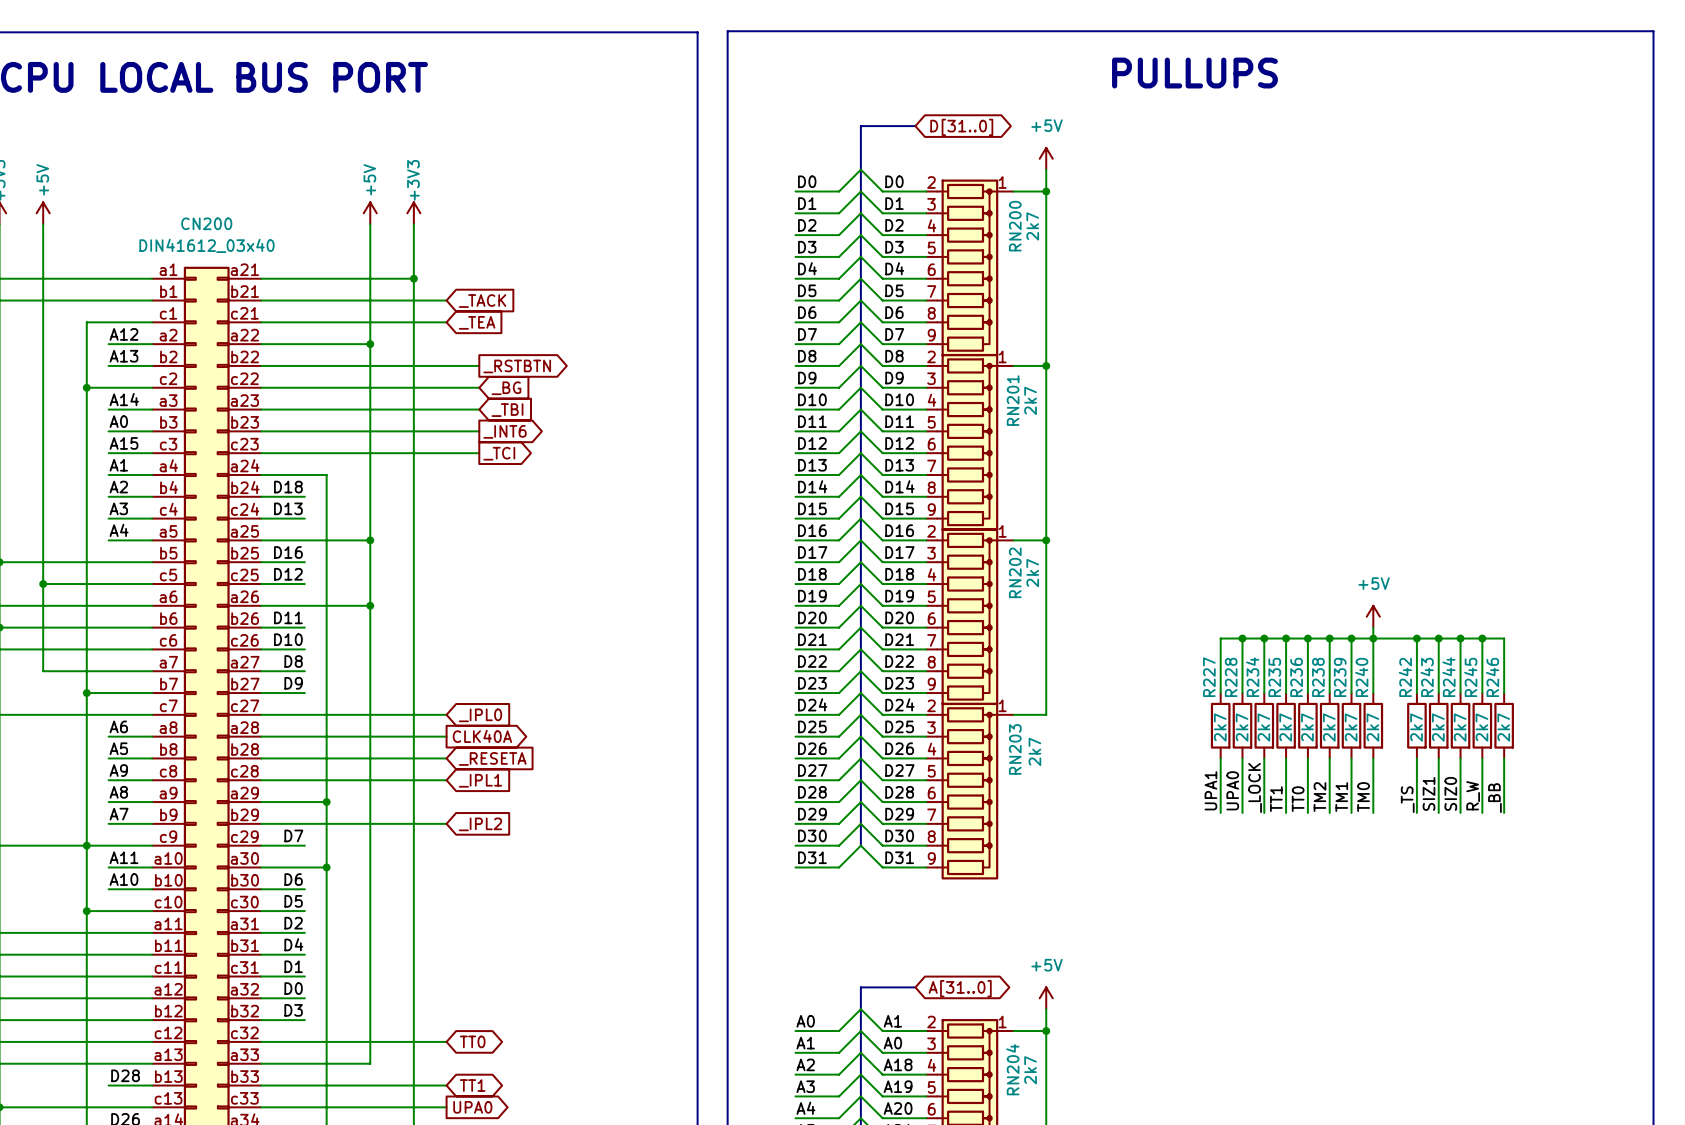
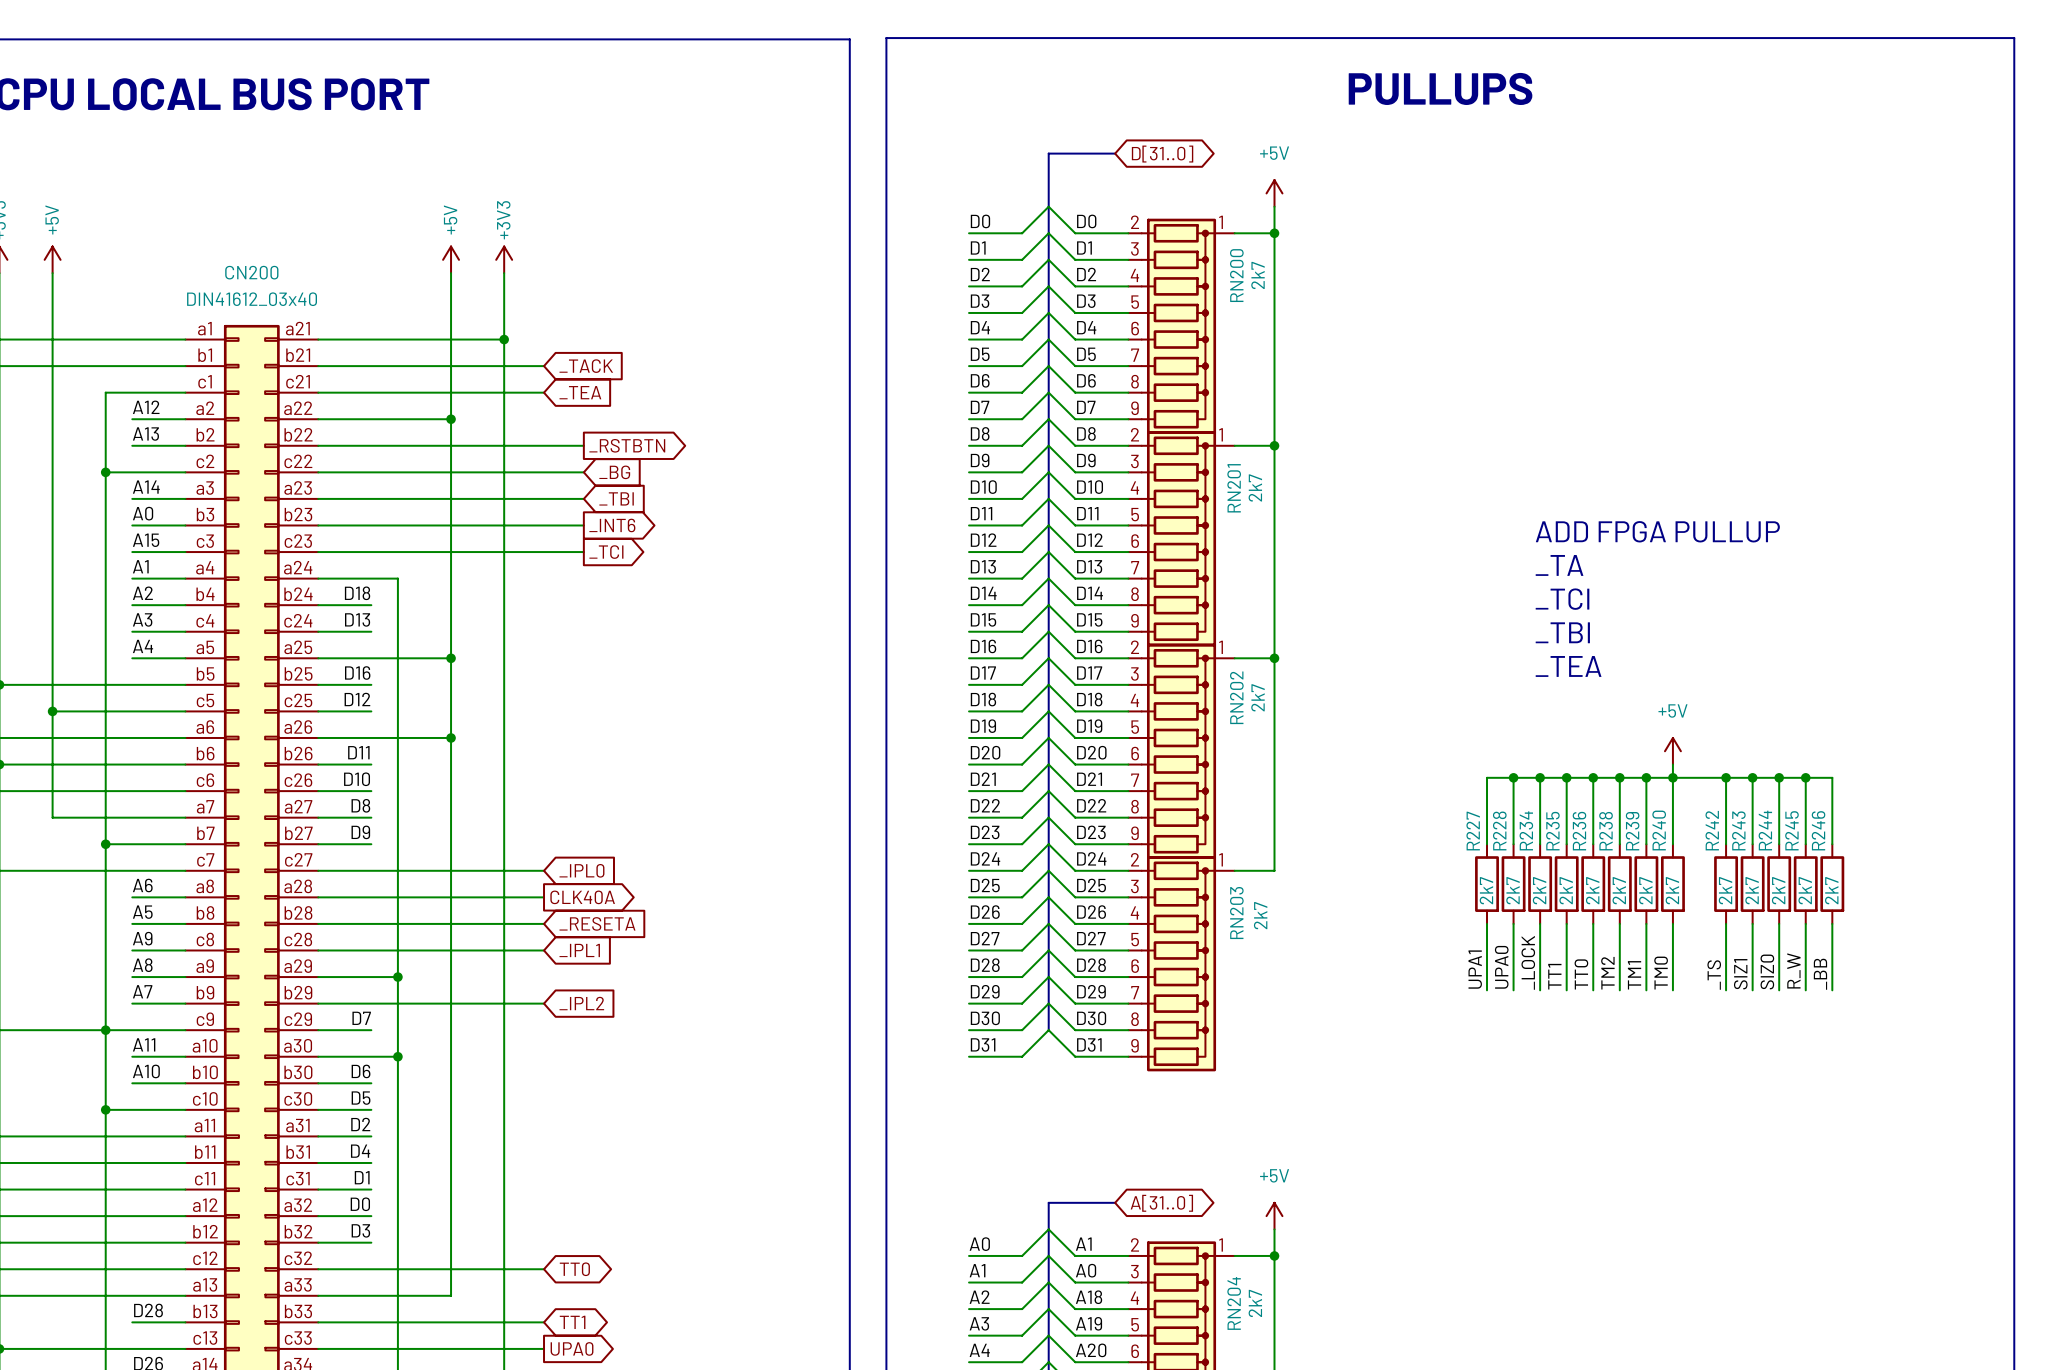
text: none -> ADD FPGA PULLUP (1657, 531)
text: none -> _TA (1559, 565)
text: none -> _TCI (1562, 599)
text: none -> _TBI (1562, 632)
text: none -> _TEA (1568, 666)

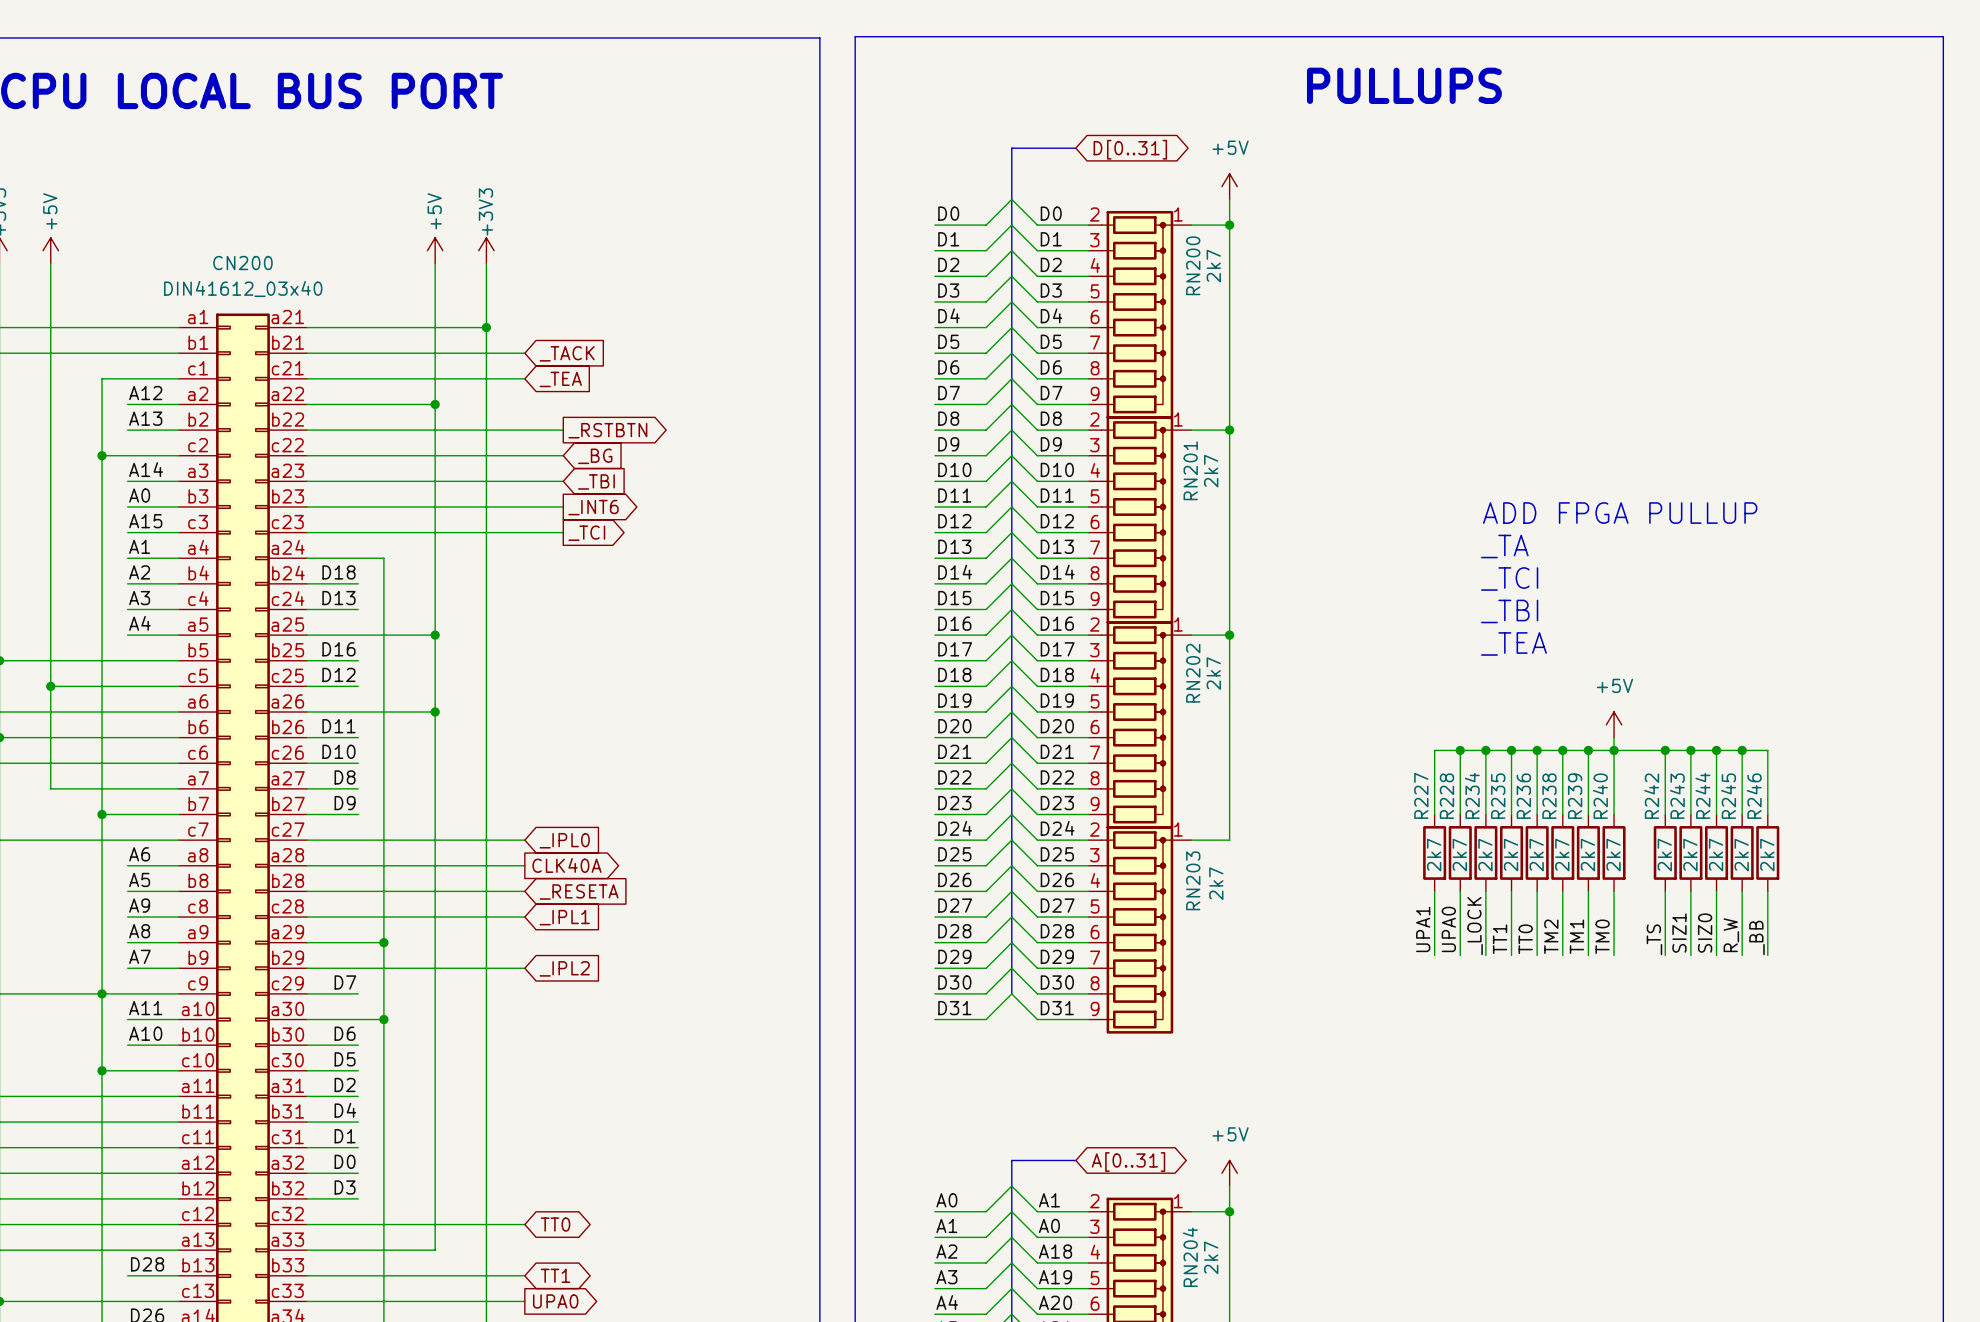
global label: D[31..0] (1162, 154) -> D[0..31] (1130, 149)
global label: A[31..0] (1161, 1203) -> A[0..31] (1128, 1162)

